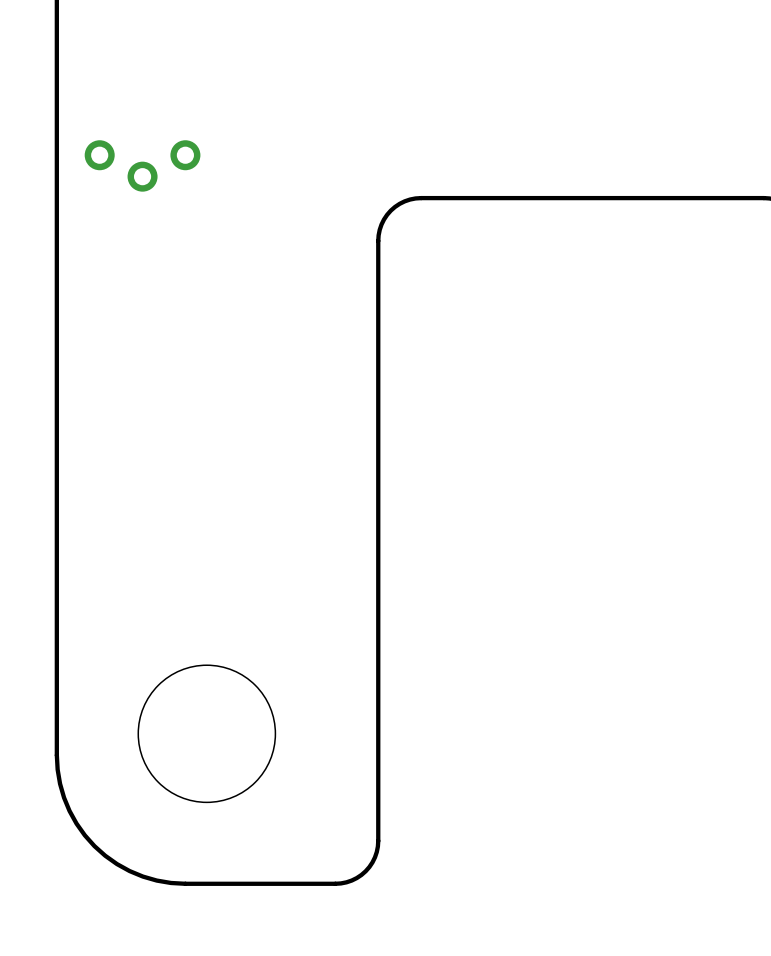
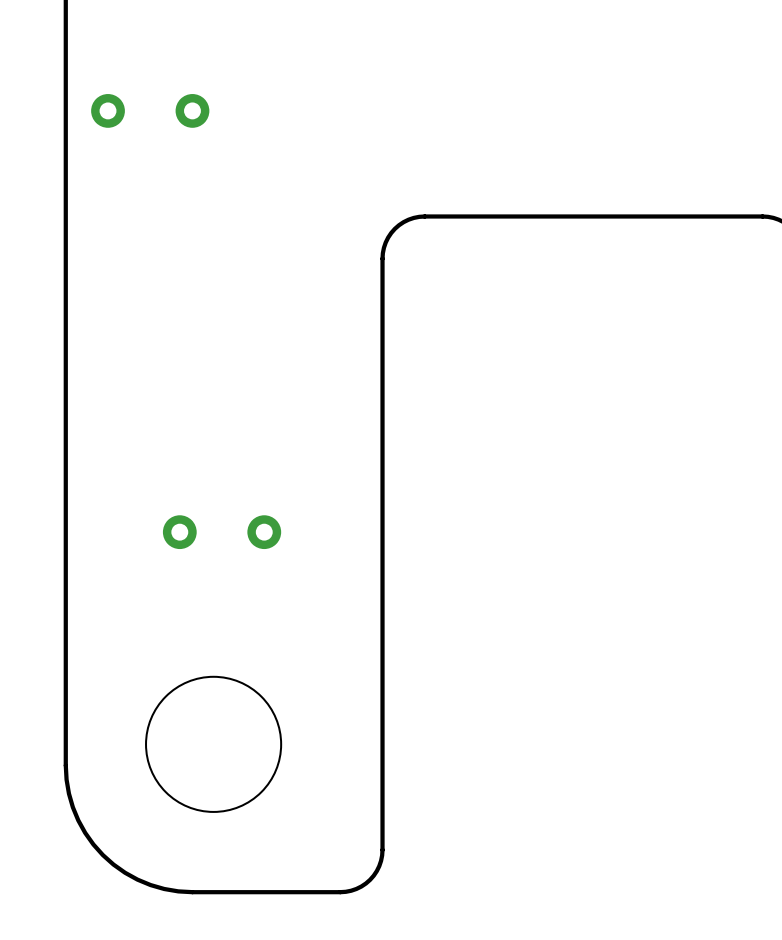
via: none -> (108, 110)
via: none -> (192, 110)
via: (99, 155) -> none
via: (185, 155) -> none
via: (142, 176) -> none
via: none -> (179, 532)
via: none -> (264, 532)

